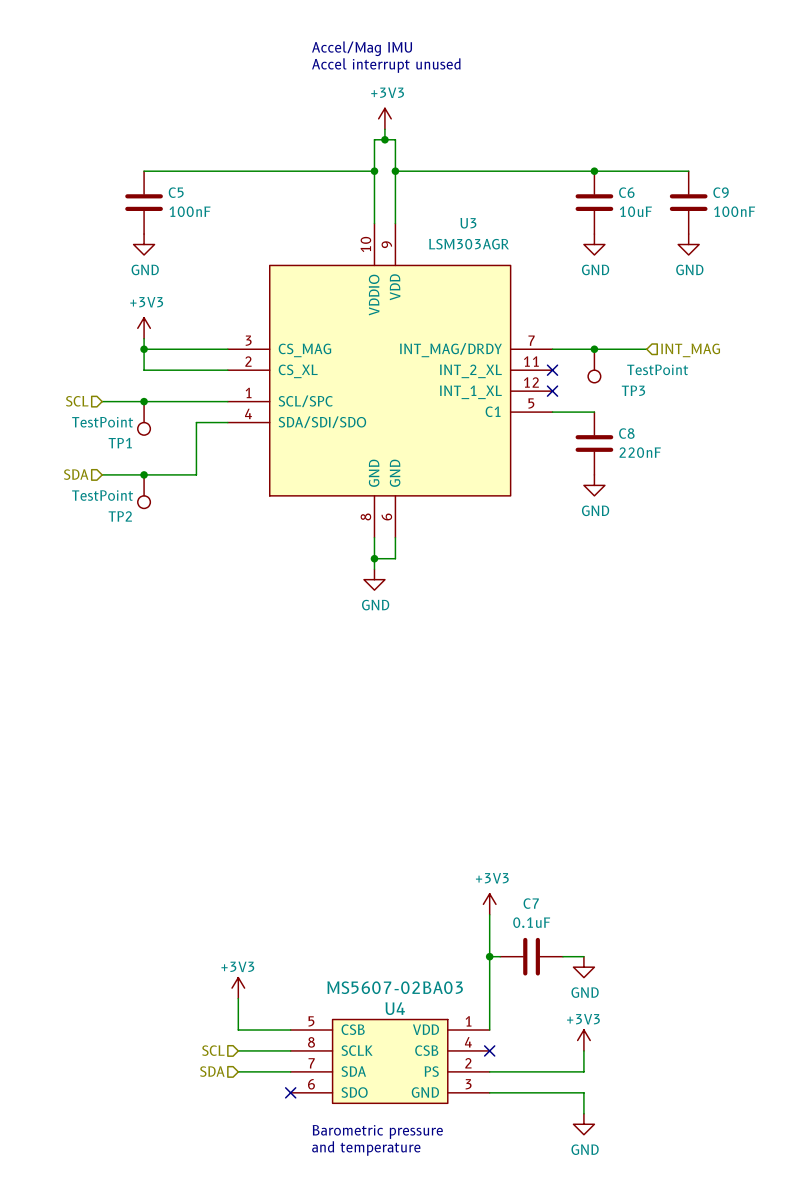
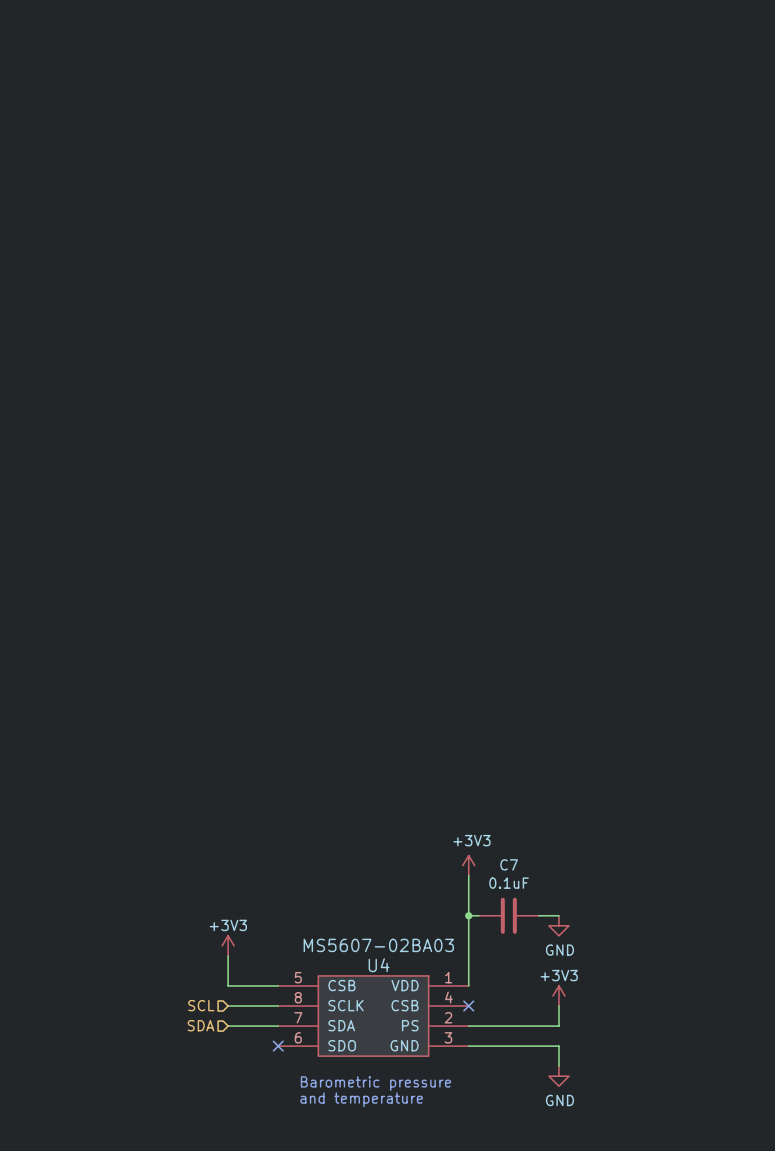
text: Accel/Mag IMU (362, 48) -> none
text: Accel interrupt unused (386, 65) -> none
power symbol: +3V3 (384, 118) -> none
wire: (384, 129) (384, 139) -> none
junction: (384, 139) -> none
wire: (144, 171) (374, 171) -> none
junction: (374, 171) -> none
wire: (395, 171) (688, 171) -> none
junction: (395, 171) -> none
junction: (594, 171) -> none
C5: 100nF (144, 202) -> none
C6: 10uF (594, 202) -> none
C9: 100nF (688, 202) -> none
wire: (374, 223) (374, 139) (395, 139) (395, 223) -> none
power symbol: GND (144, 244) -> none
power symbol: GND (594, 244) -> none
power symbol: GND (688, 244) -> none
power symbol: +3V3 (144, 328) -> none
wire: (144, 338) (144, 370) (227, 370) -> none
wire: (144, 349) (227, 349) -> none
junction: (144, 349) -> none
wire: (552, 349) (646, 349) -> none
junction: (594, 349) -> none
hierarchical label: INT_MAG (690, 350) -> none
TP3: TestPoint (594, 366) -> none
no-connect mark: (552, 370) -> none
U3: LSM303AGR (390, 380) -> none
no-connect mark: (552, 391) -> none
hierarchical label: SCL (77, 401) -> none
wire: (102, 401) (227, 401) -> none
junction: (144, 401) -> none
wire: (552, 412) (594, 412) -> none
TP1: TestPoint (144, 418) -> none
wire: (227, 422) (196, 422) (196, 474) (102, 474) -> none
C8: 220nF (594, 443) -> none
hierarchical label: SDA (76, 474) -> none
junction: (144, 474) -> none
power symbol: GND (594, 485) -> none
TP2: TestPoint (144, 491) -> none
wire: (374, 537) (374, 569) -> none
wire: (395, 537) (395, 558) (374, 558) -> none
junction: (374, 558) -> none
power symbol: GND (374, 579) -> none

